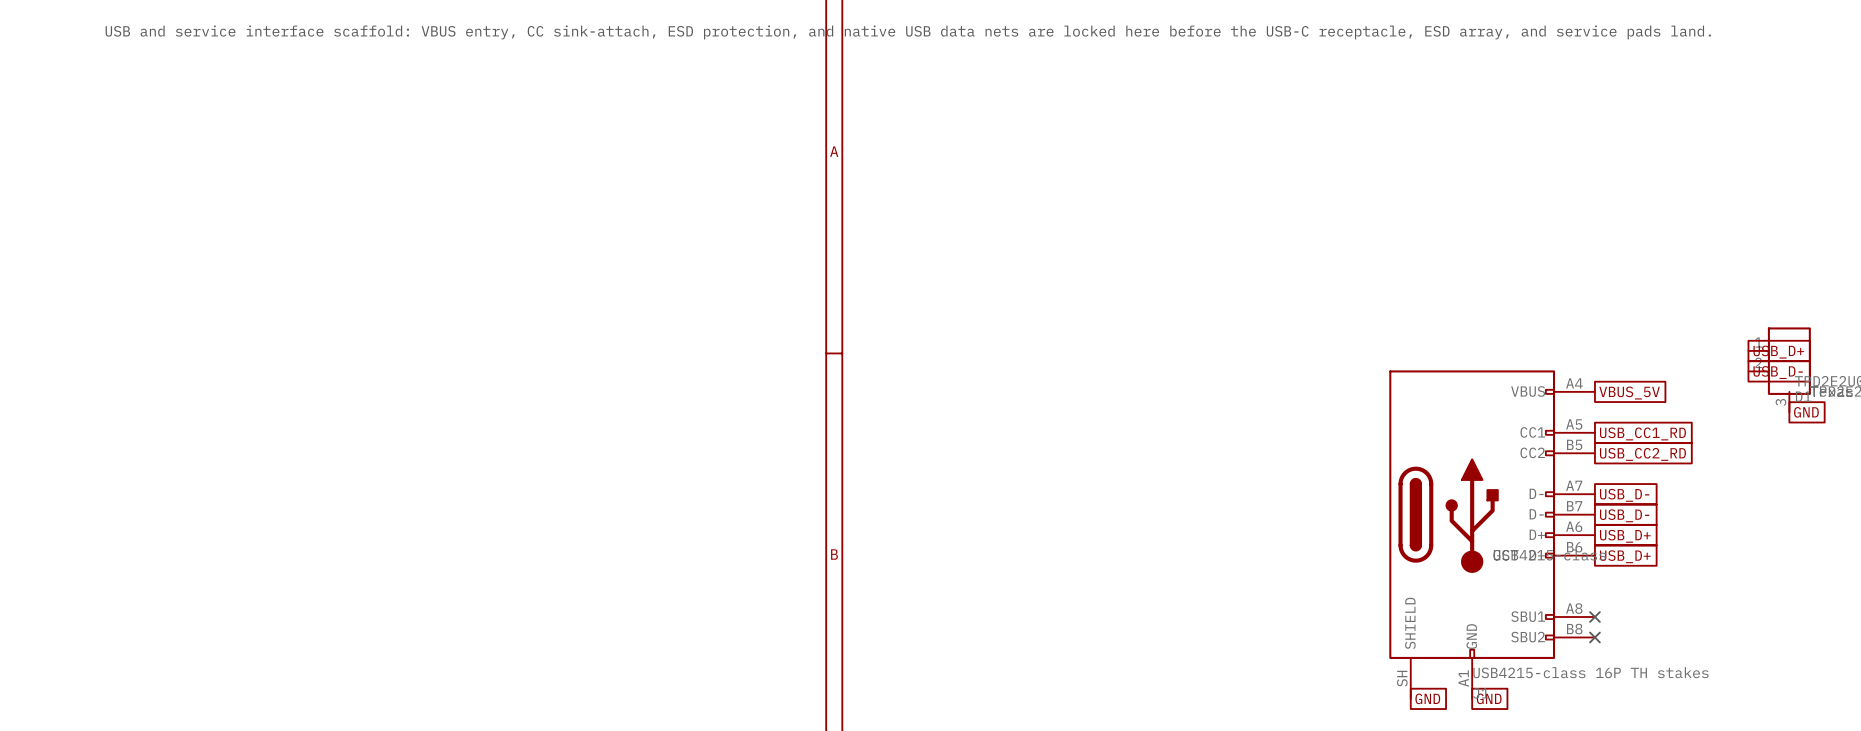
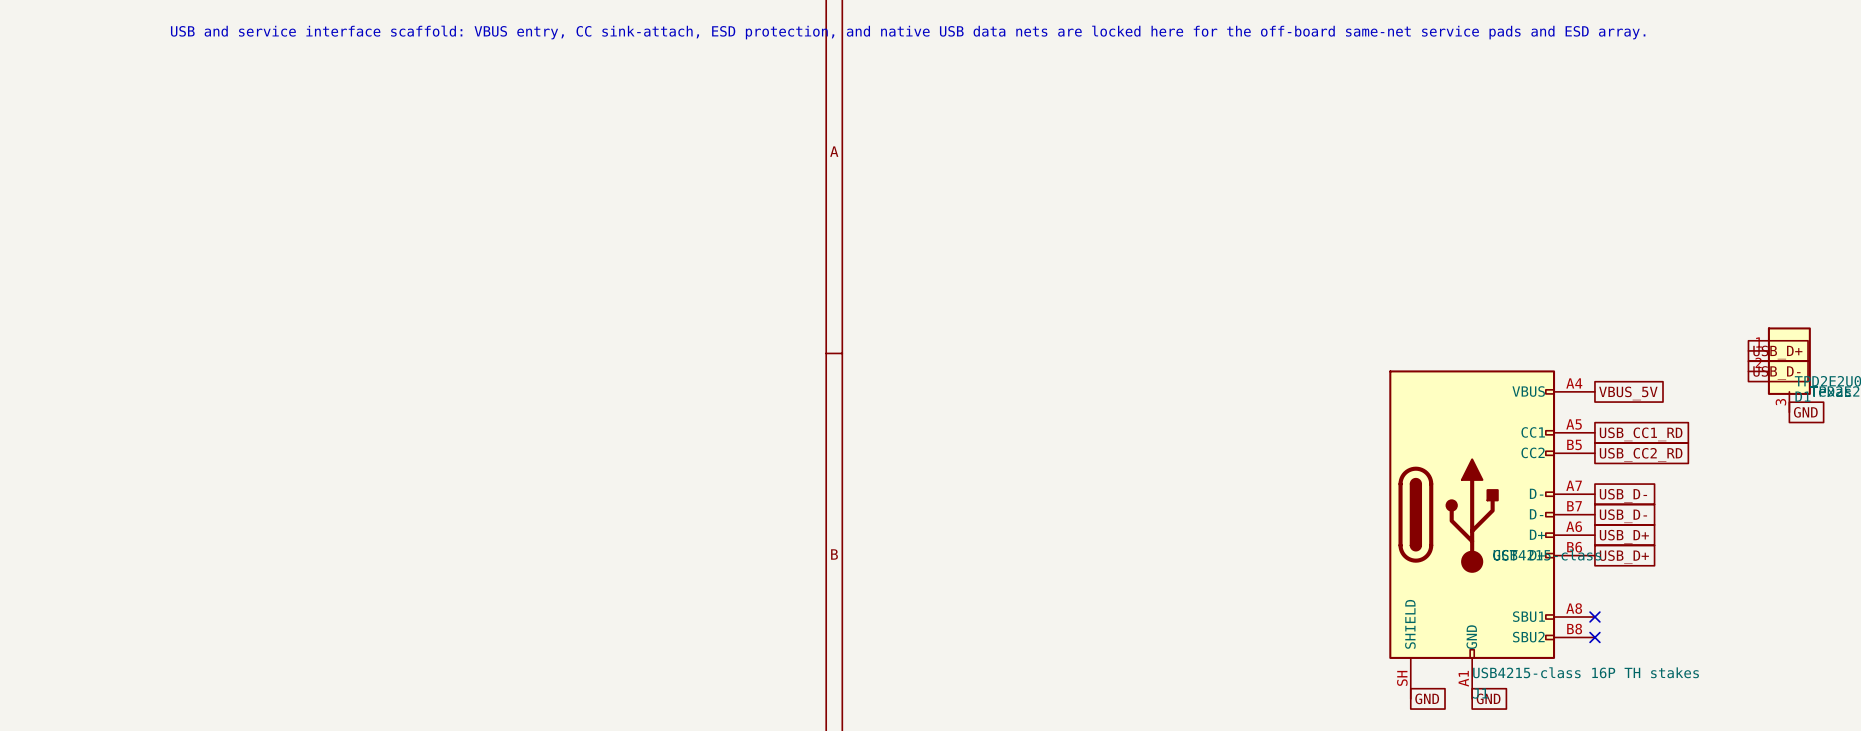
text: USB and service interface scaffold: VBUS entry, CC sink-attach, ESD protection, and native USB data nets are locked here before the USB-C receptacle, ESD array, and service pads land. (908, 32) -> USB and service interface scaffold: VBUS entry, CC sink-attach, ESD protection, and native USB data nets are locked here for the off-board same-net service pads and ESD array. (908, 32)

